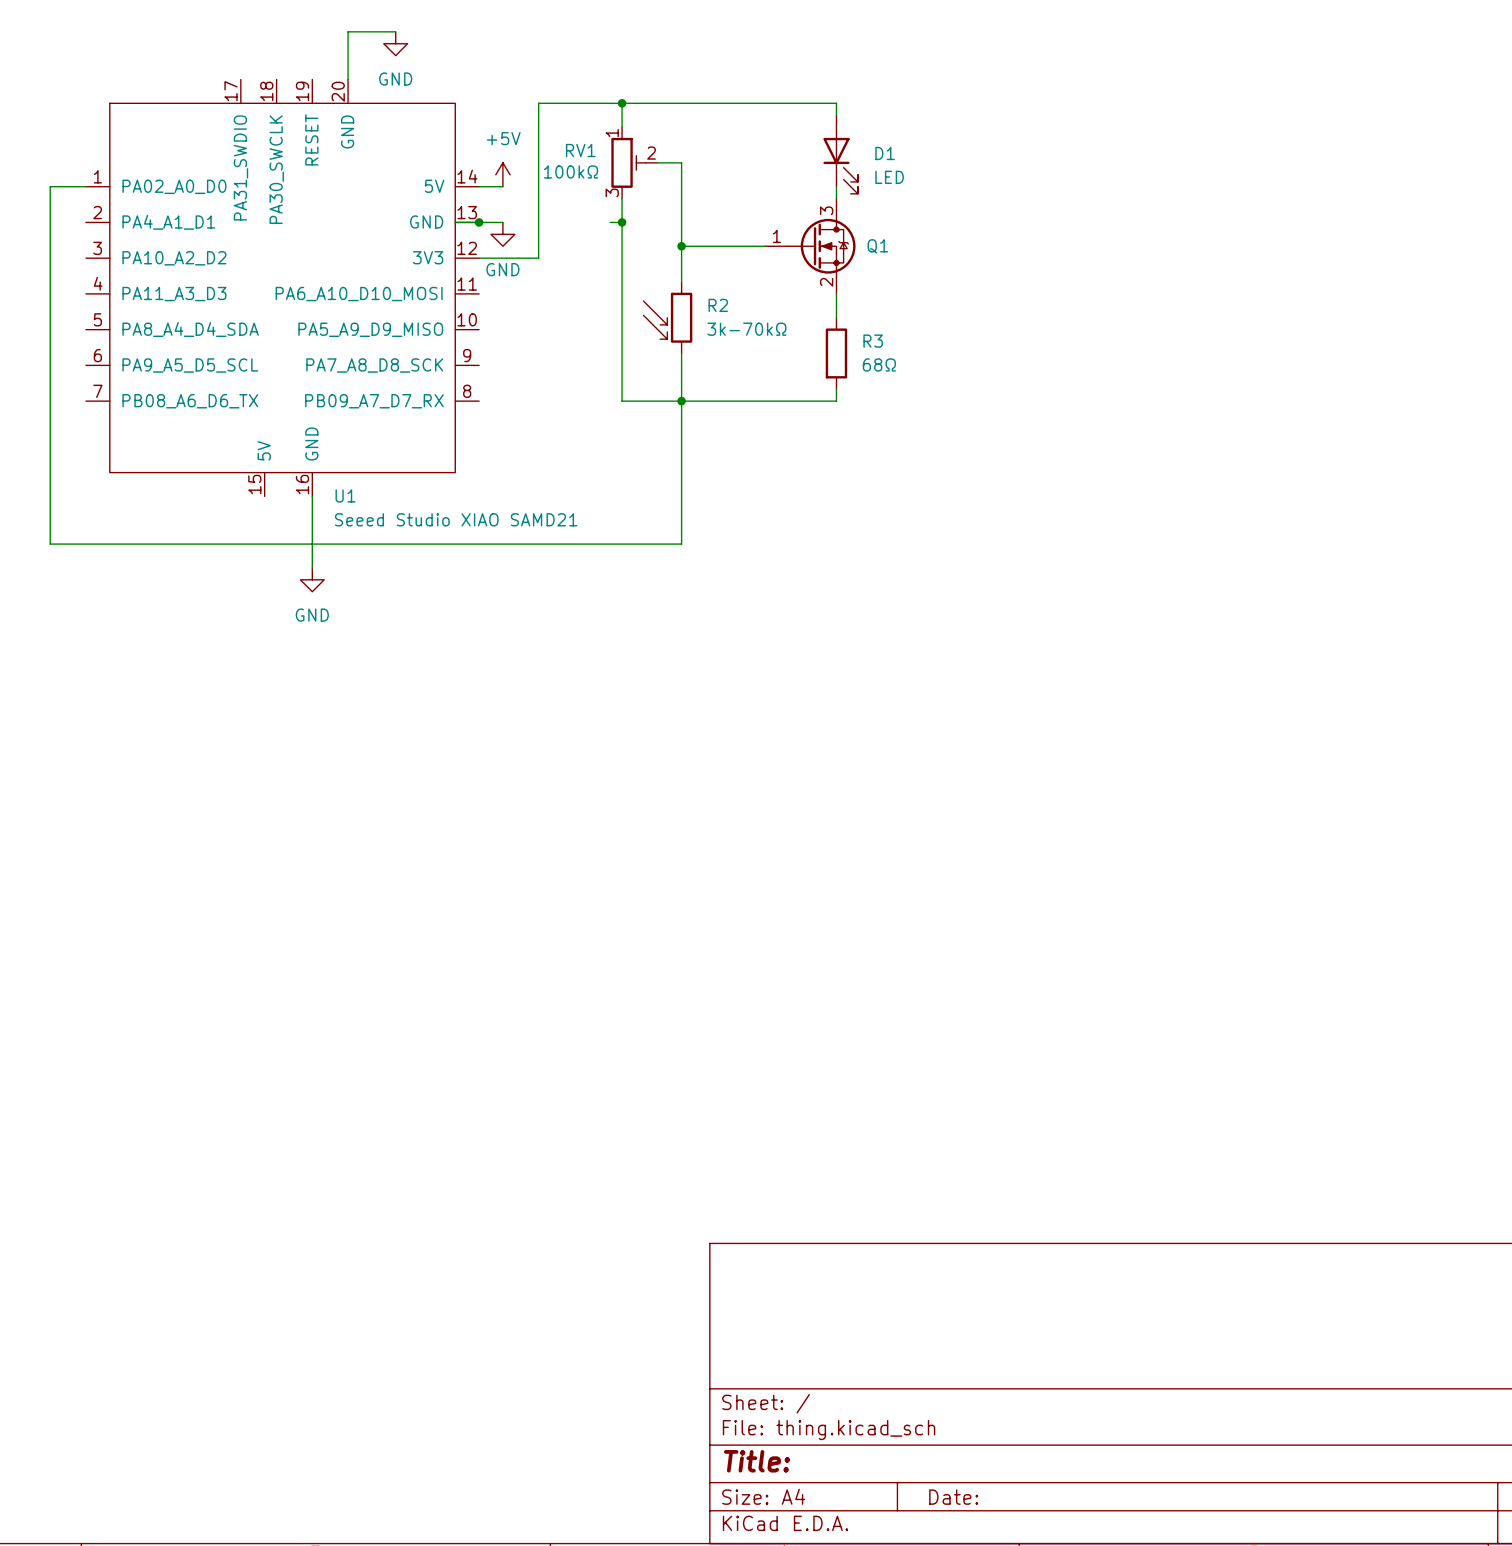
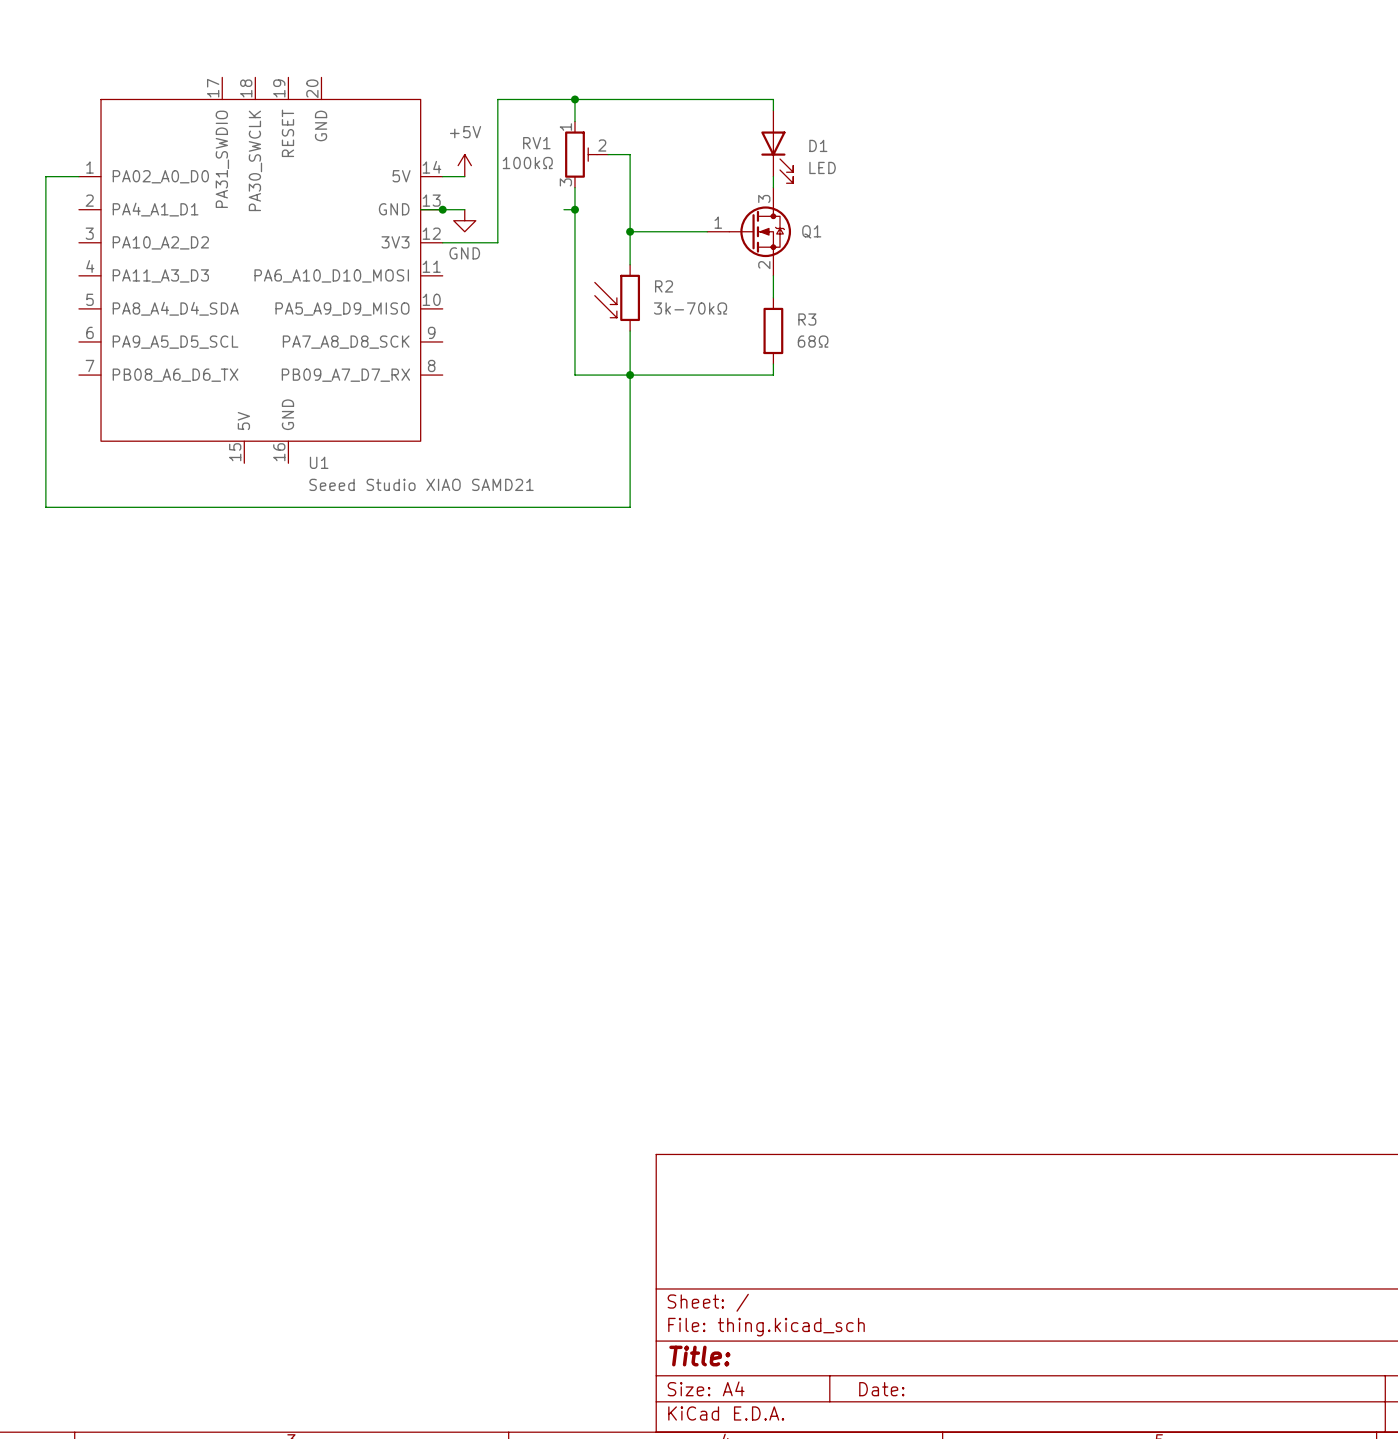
wire: (395, 31) (348, 31) (348, 79) -> none
power symbol: GND (395, 43) -> none
wire: (312, 496) (312, 567) -> none
power symbol: GND (312, 579) -> none

